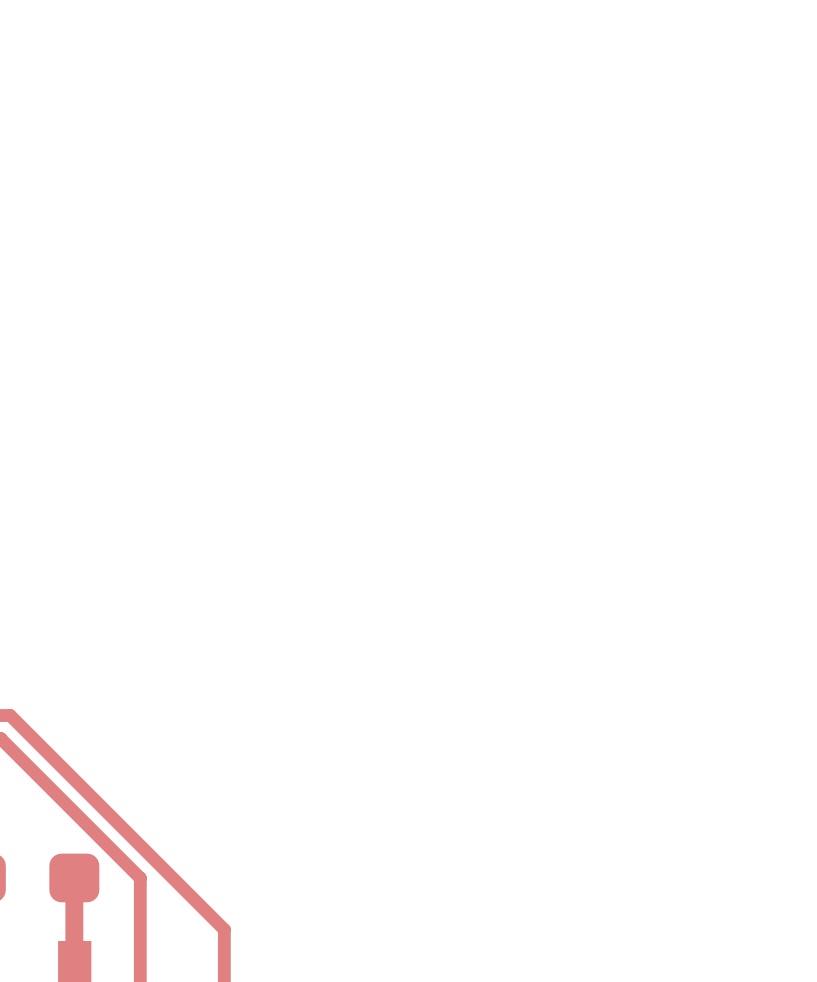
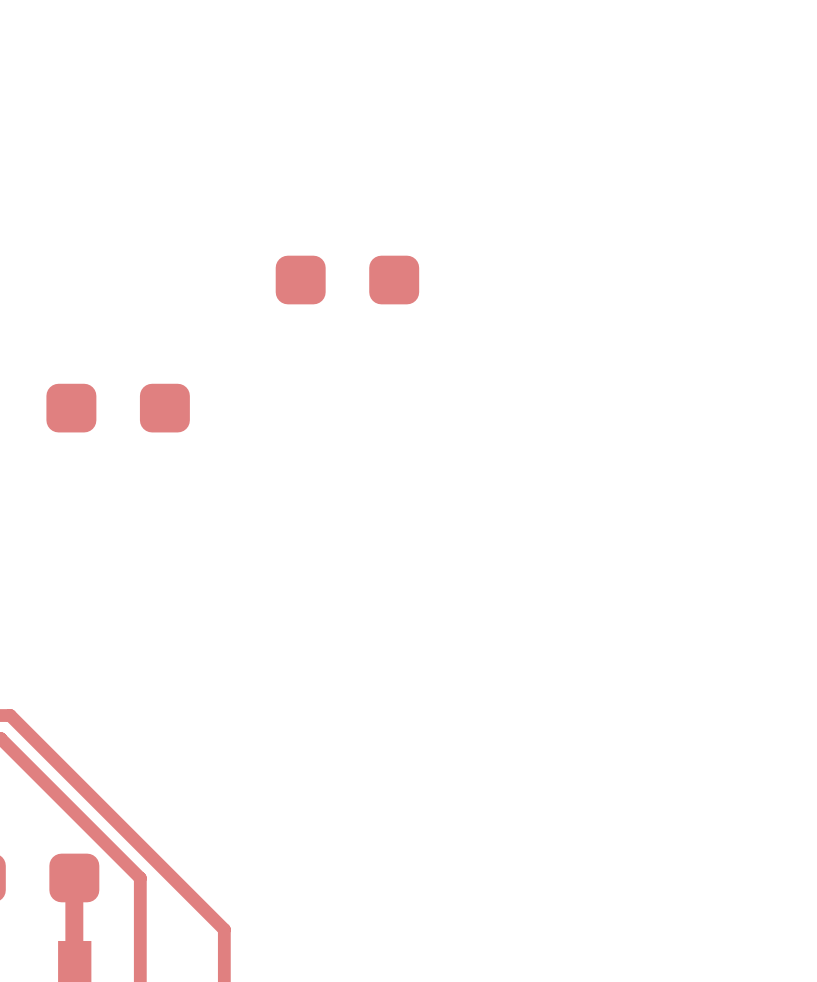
part: none -> (347, 280)
part: none -> (118, 408)

